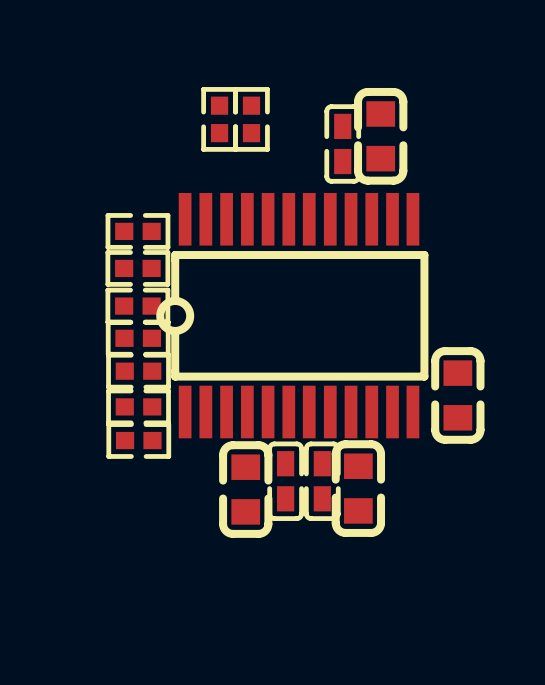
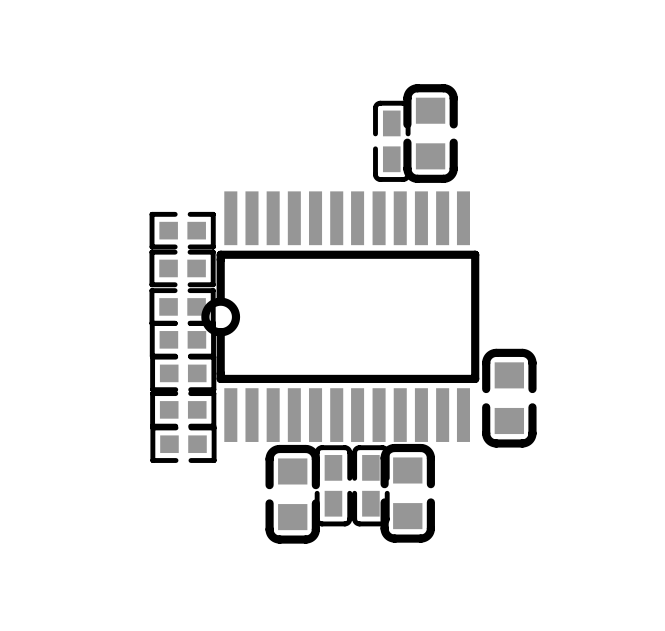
part: (219, 119) -> none
part: (251, 119) -> none

